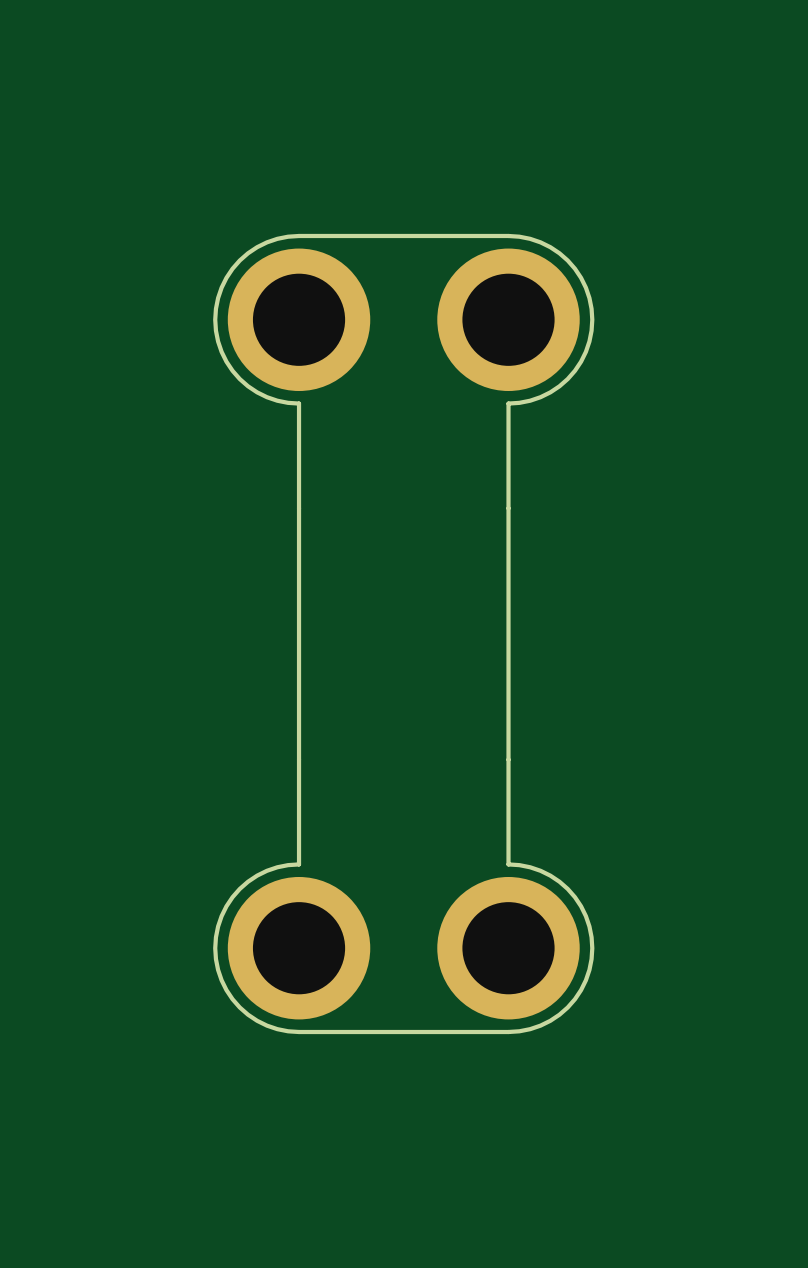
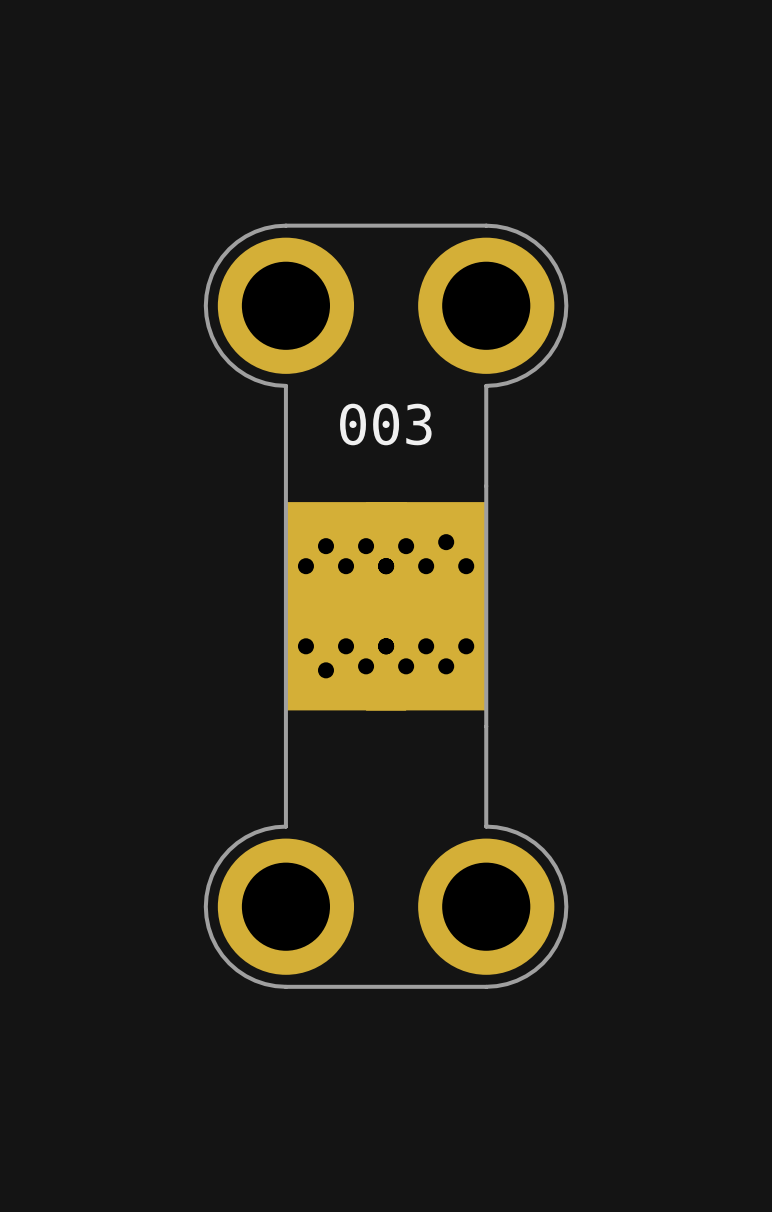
text: none -> 003 (385, 424)
part: none -> (346, 606)
part: none -> (426, 606)

